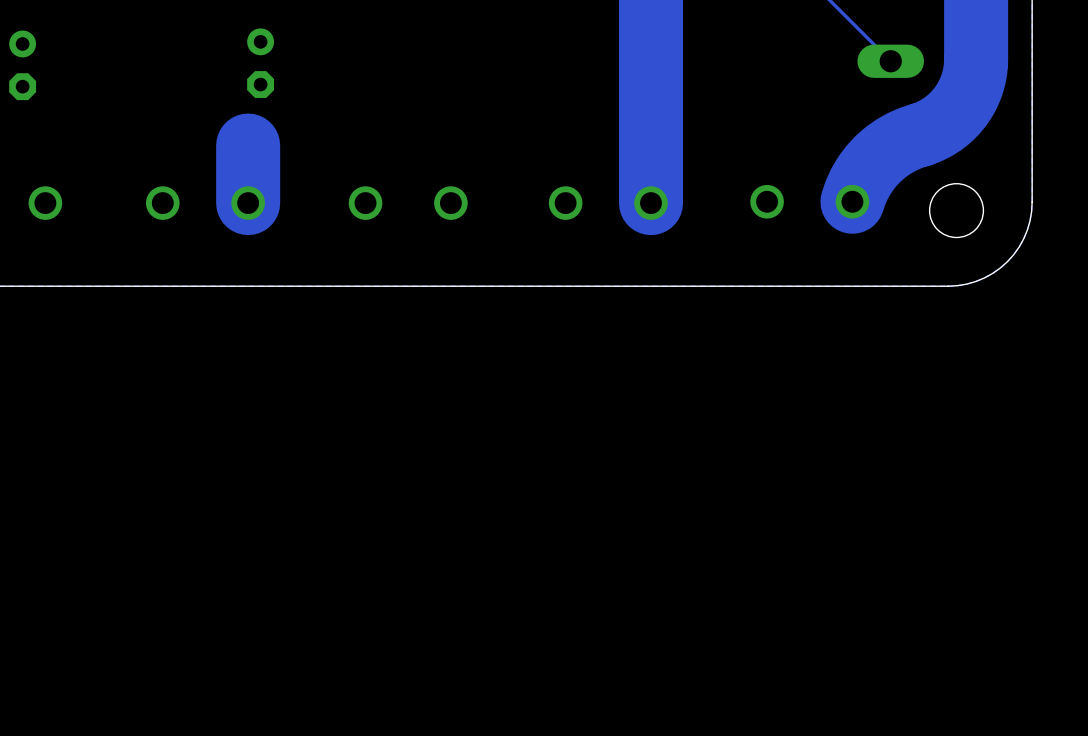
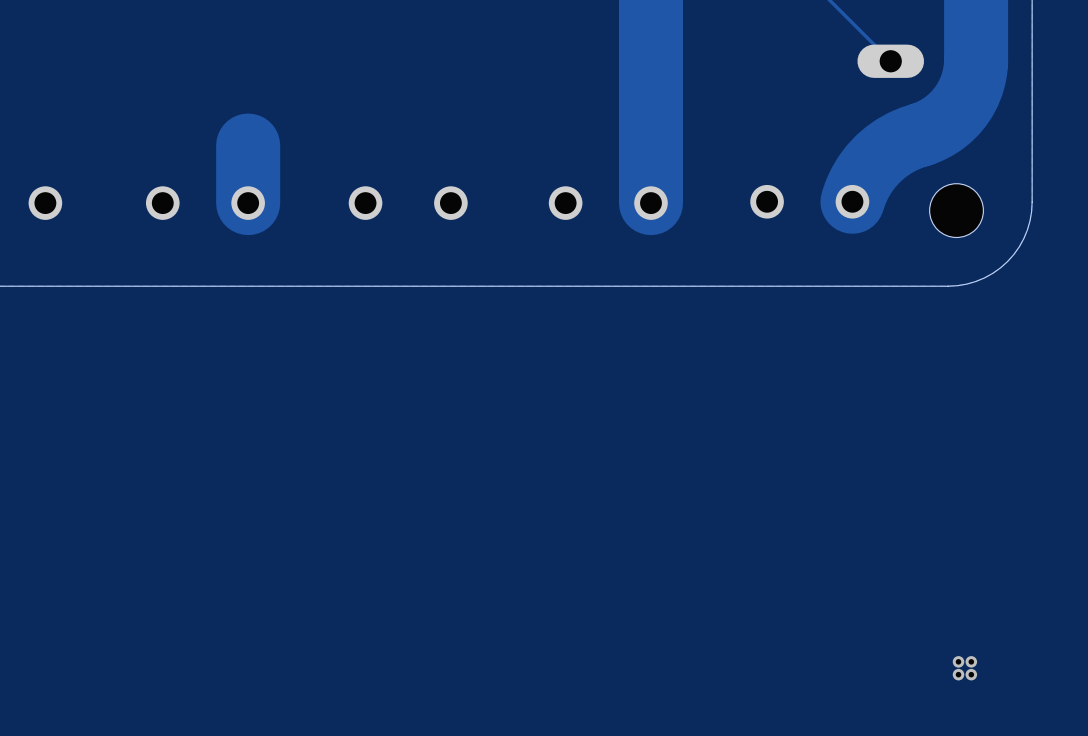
part: (260, 63) -> none
part: (22, 65) -> none
via: none -> (958, 661)
via: none -> (971, 661)
via: none -> (958, 674)
via: none -> (971, 674)

